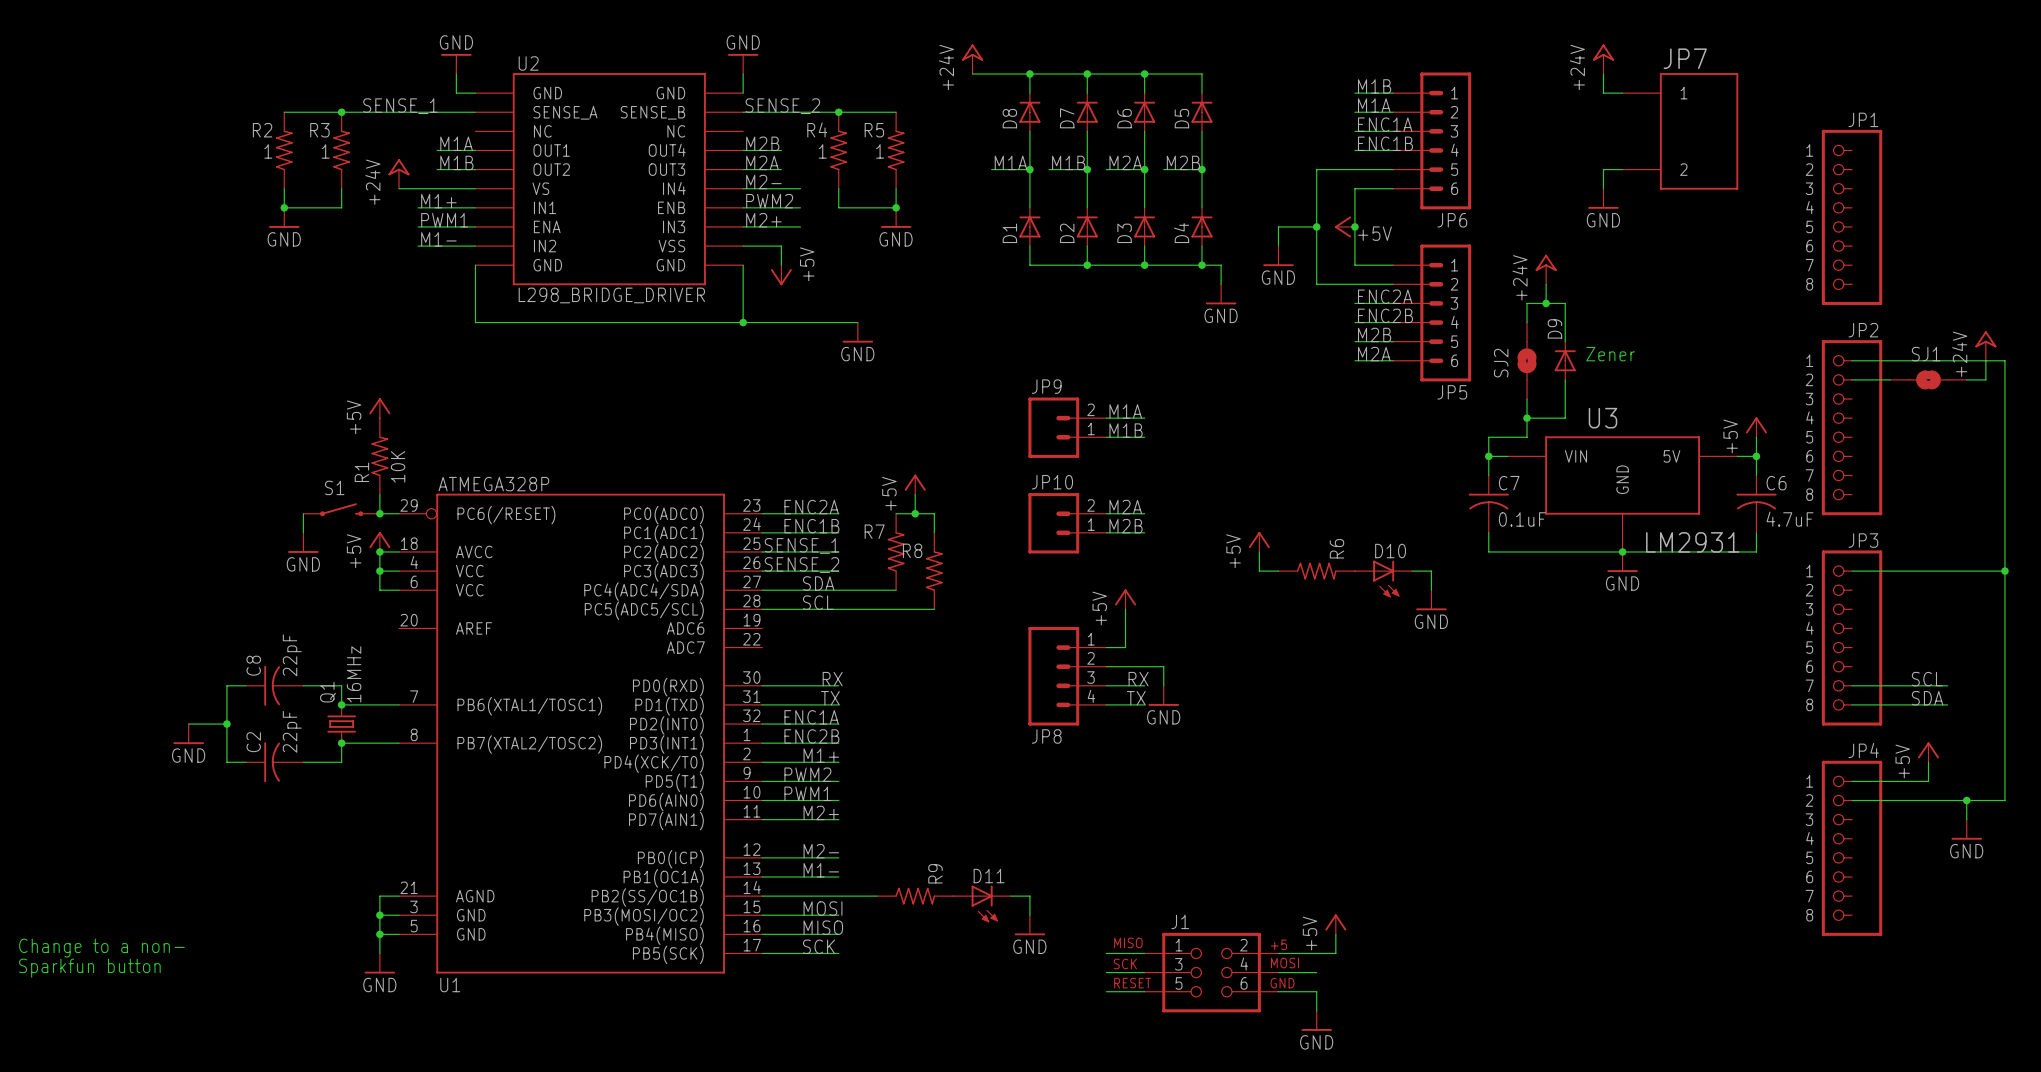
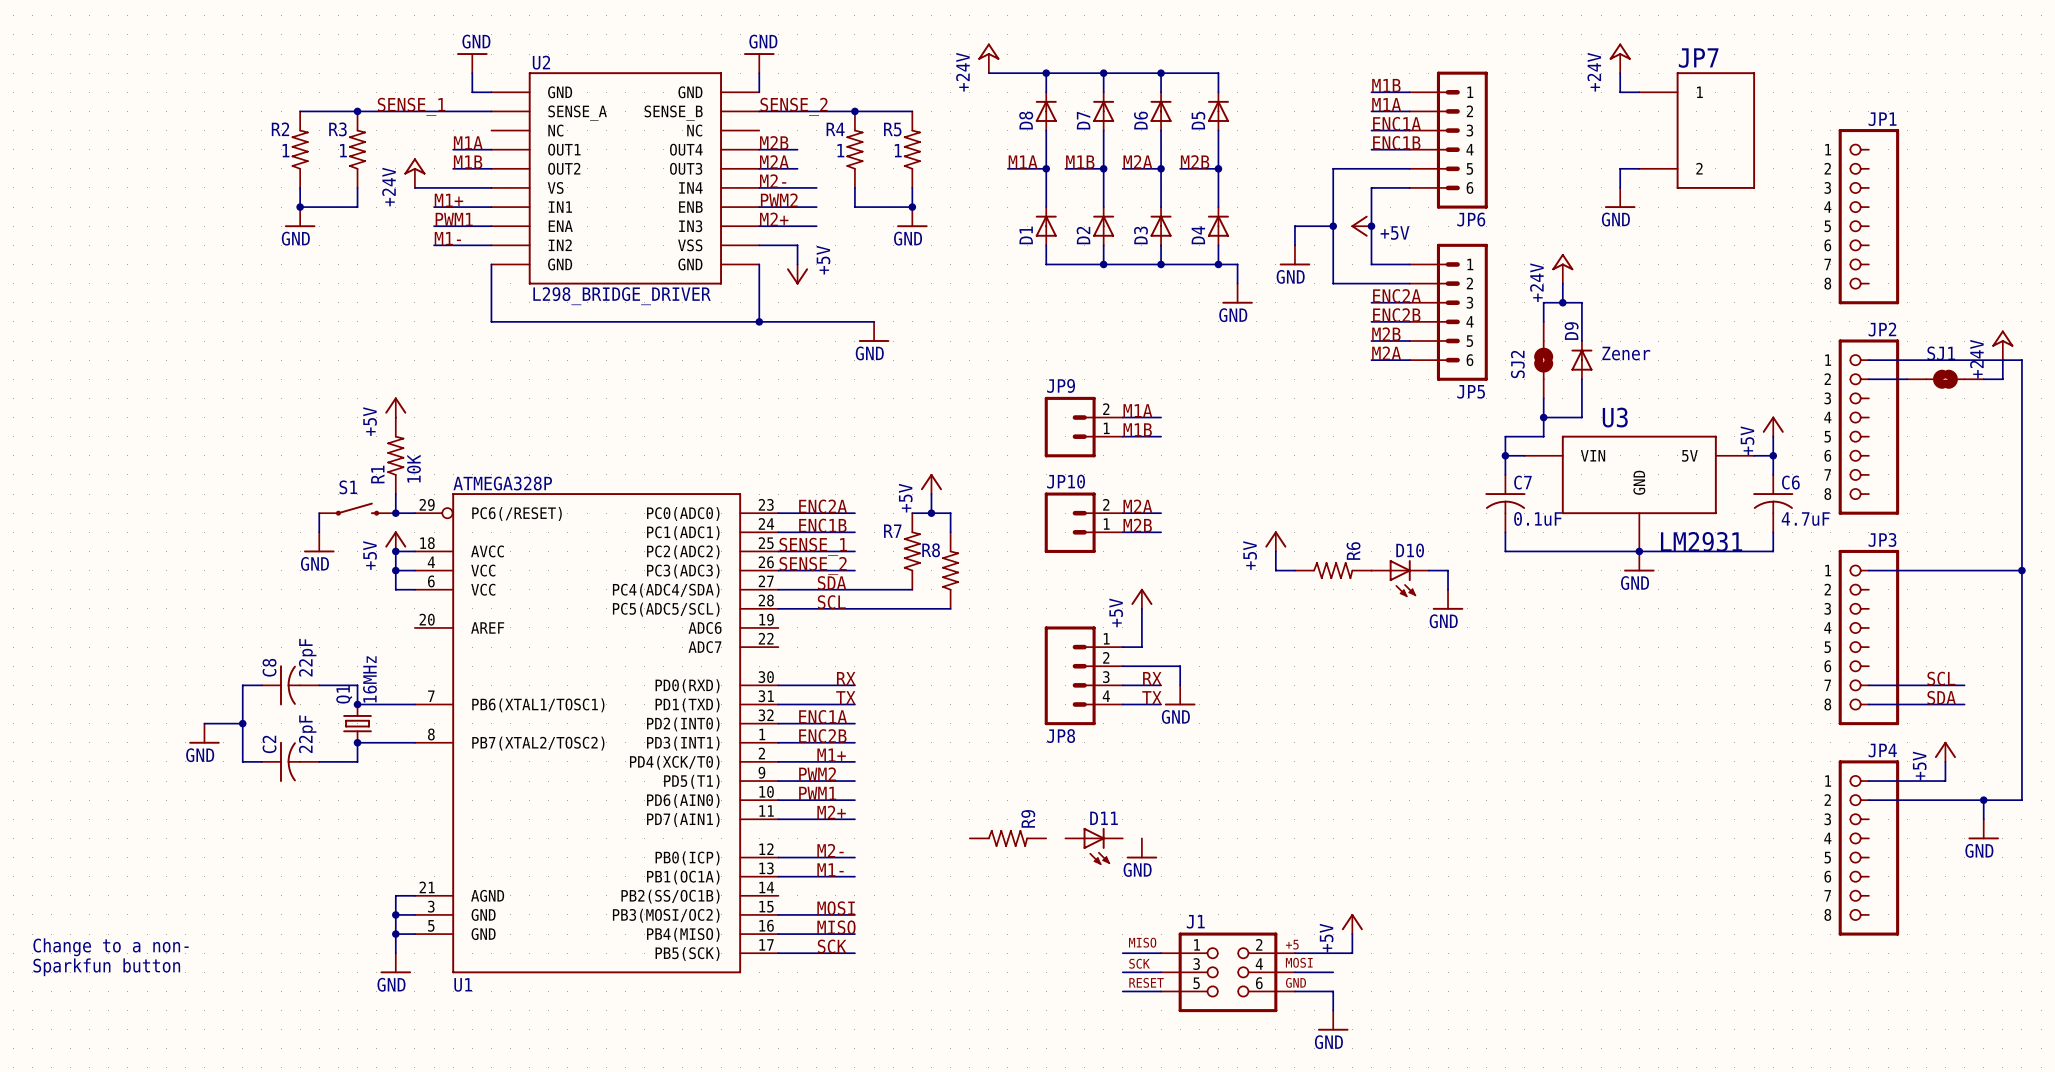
wire: (762, 896) (876, 896) -> none
R9 position: (915, 896) -> (1007, 838)
wire: (1010, 896) (1029, 896) (1029, 915) -> none
D11 position: (982, 904) -> (1094, 846)
power symbol position: GND (1029, 925) -> GND (1141, 848)

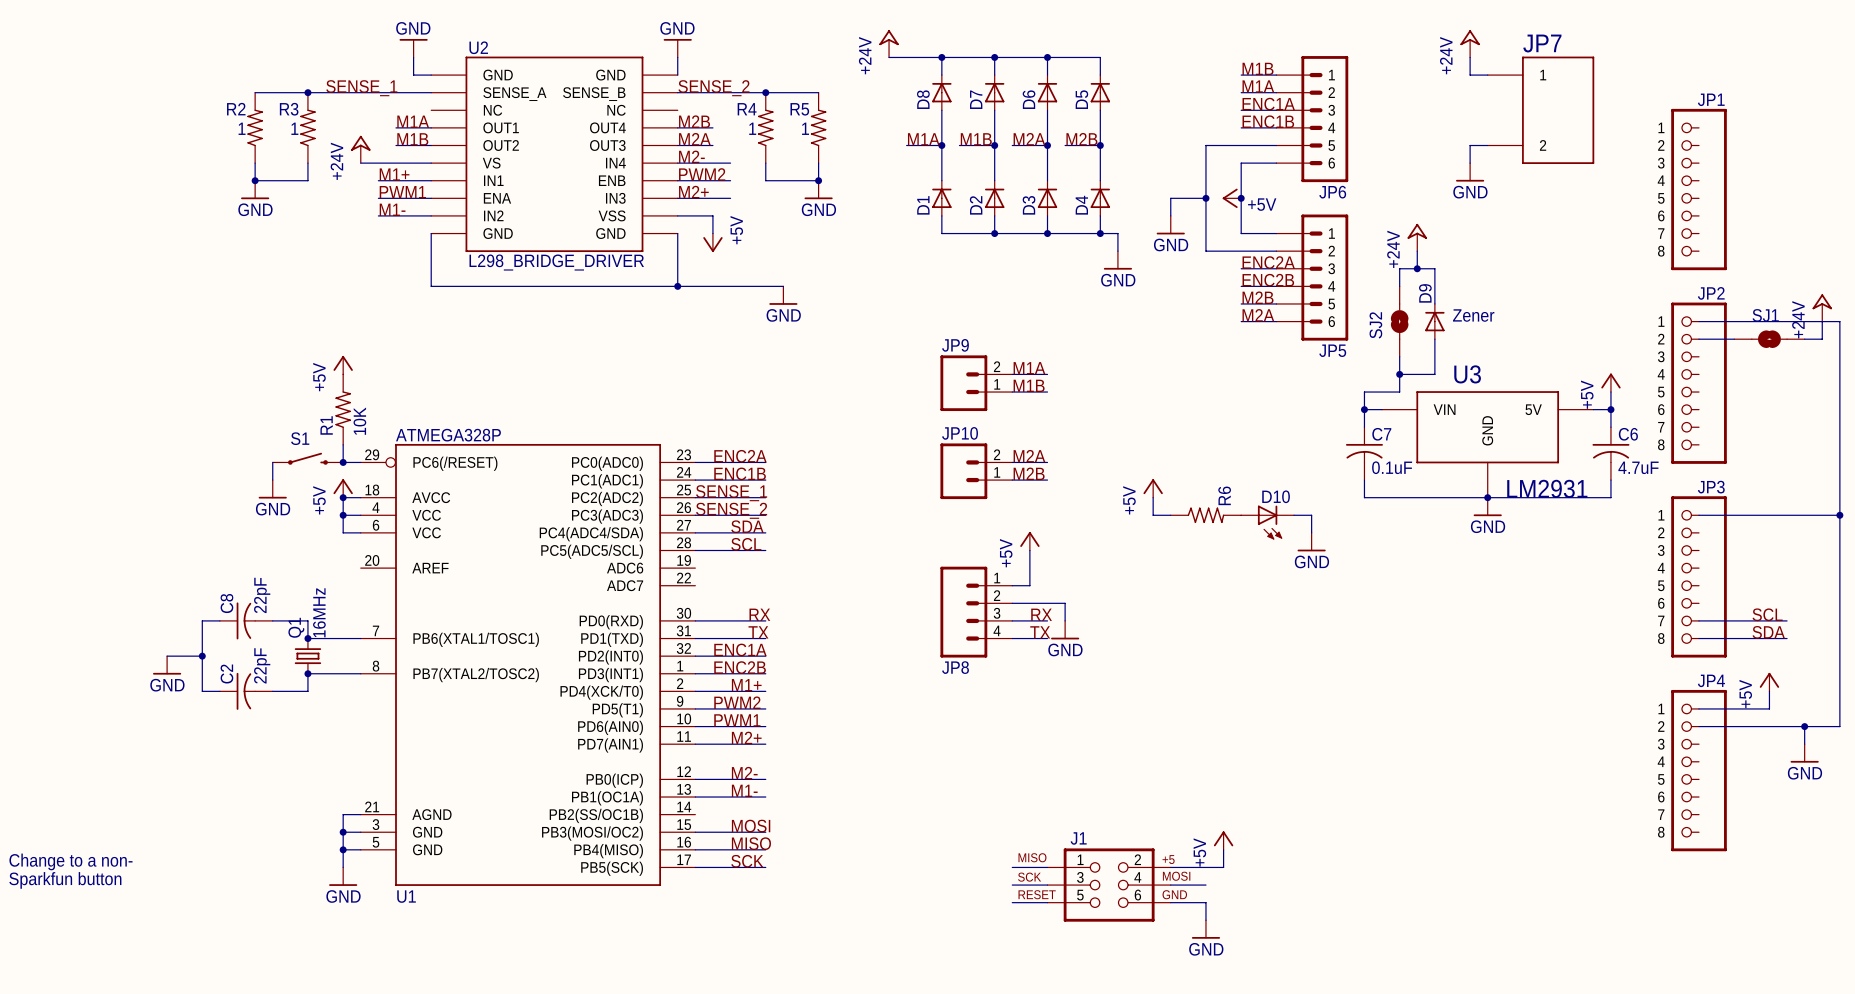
power symbol: +5V (931, 484) -> none
wire: (931, 494) (931, 513) -> none
wire: (912, 513) (950, 513) (950, 532) -> none
junction: (931, 513) -> none
R7: (912, 551) -> none
R8: (950, 570) -> none
wire: (854, 589) (912, 589) -> none
wire: (854, 608) (950, 608) -> none
R9: (1007, 838) -> none
D11: (1094, 846) -> none
power symbol: GND (1141, 848) -> none

